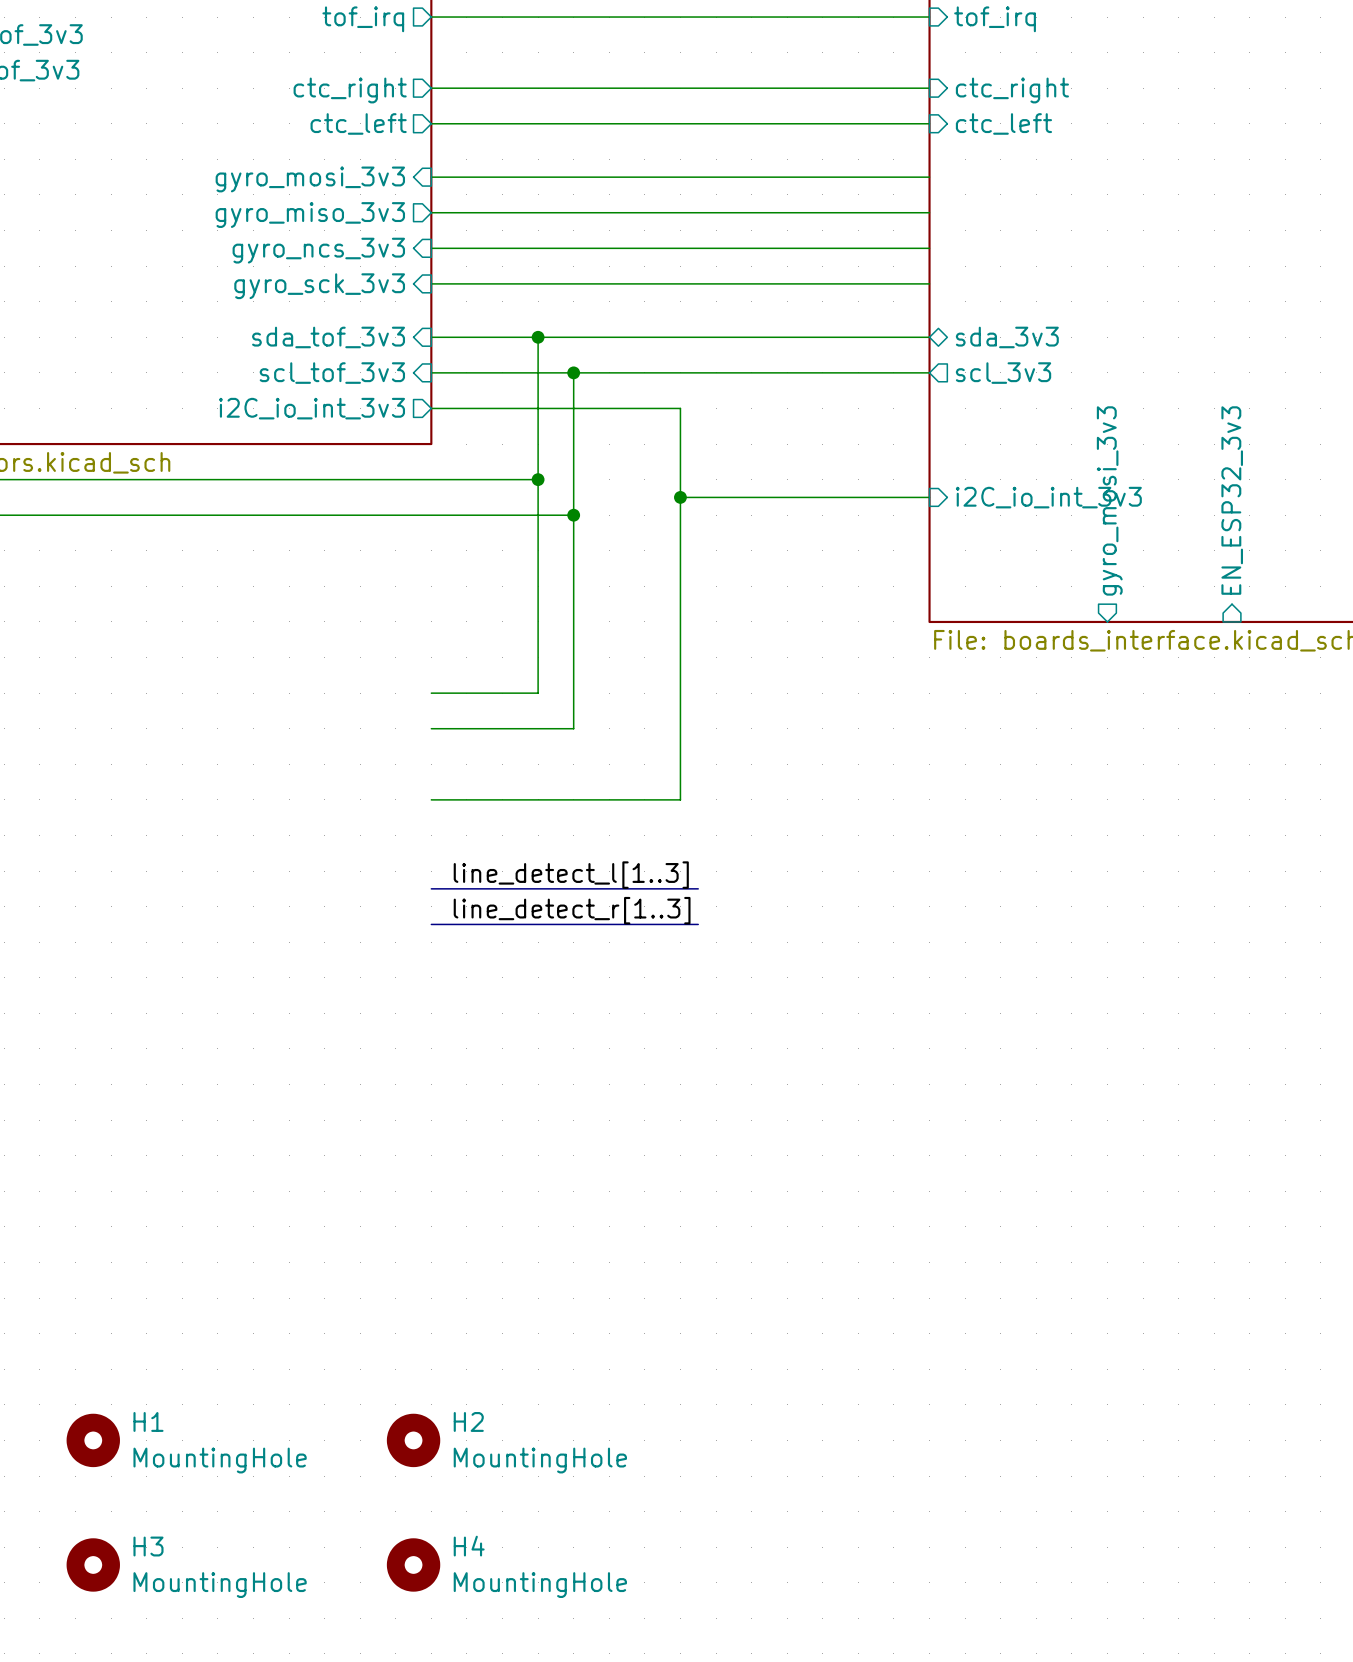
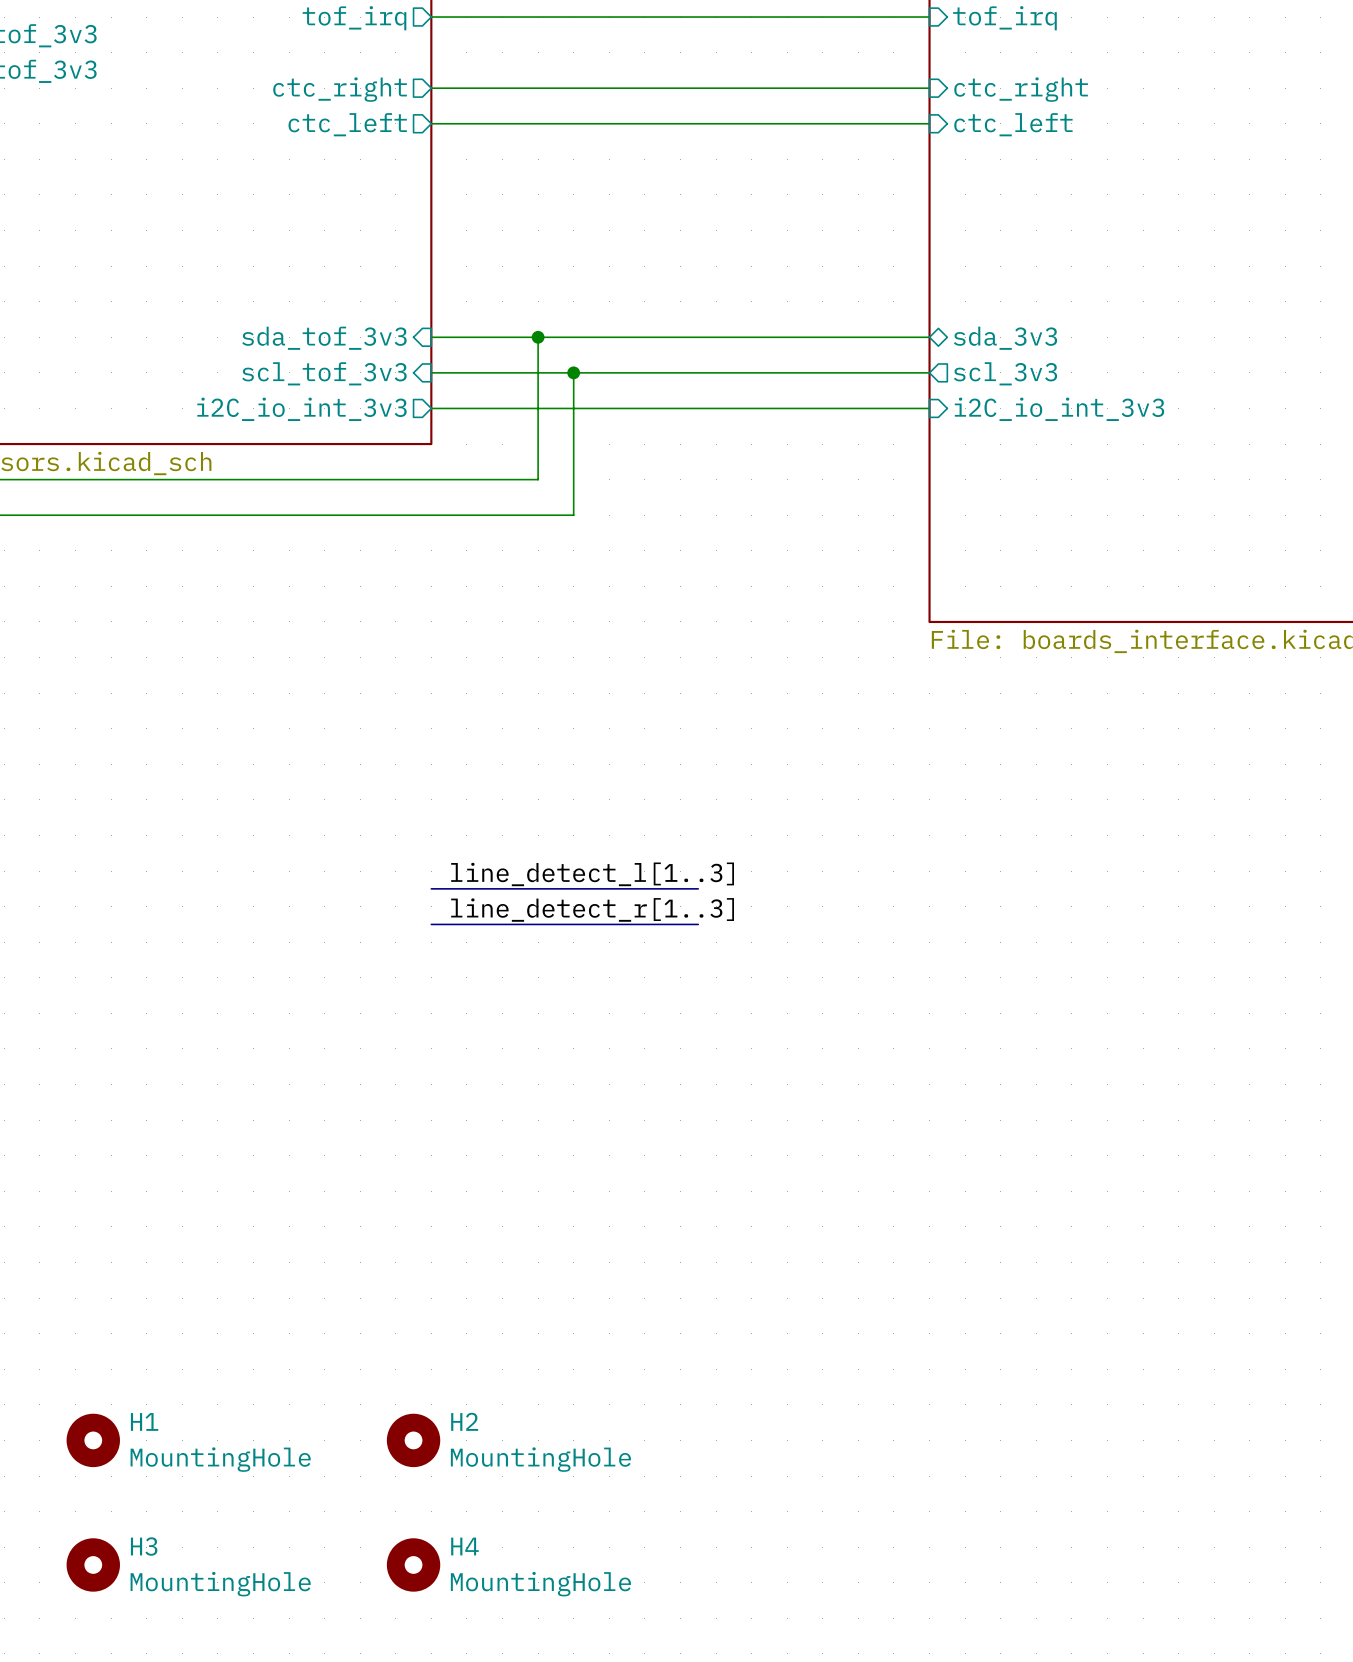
wire: (431, 177) (929, 177) -> none
sheet pin: gyro_mosi_3v3 (310, 179) -> none
wire: (431, 212) (929, 212) -> none
sheet pin: gyro_miso_3v3 (310, 215) -> none
wire: (431, 248) (929, 248) -> none
sheet pin: gyro_ncs_3v3 (318, 250) -> none
wire: (431, 283) (929, 283) -> none
sheet pin: gyro_sck_3v3 (319, 286) -> none
wire: (680, 408) (680, 799) (431, 799) -> (680, 408) (929, 408)
wire: (538, 479) (538, 693) (431, 693) -> none
junction: (538, 479) -> none
wire: (680, 497) (929, 497) -> none
junction: (680, 497) -> none
sheet pin position: i2C_io_int_3v3 (1048, 497) -> i2C_io_int_3v3 (1059, 409)
sheet pin: gyro_mosi_3v3 (1109, 500) -> none
sheet pin: EN_ESP32_3v3 (1232, 500) -> none
wire: (573, 515) (573, 728) (431, 728) -> none
junction: (573, 515) -> none

